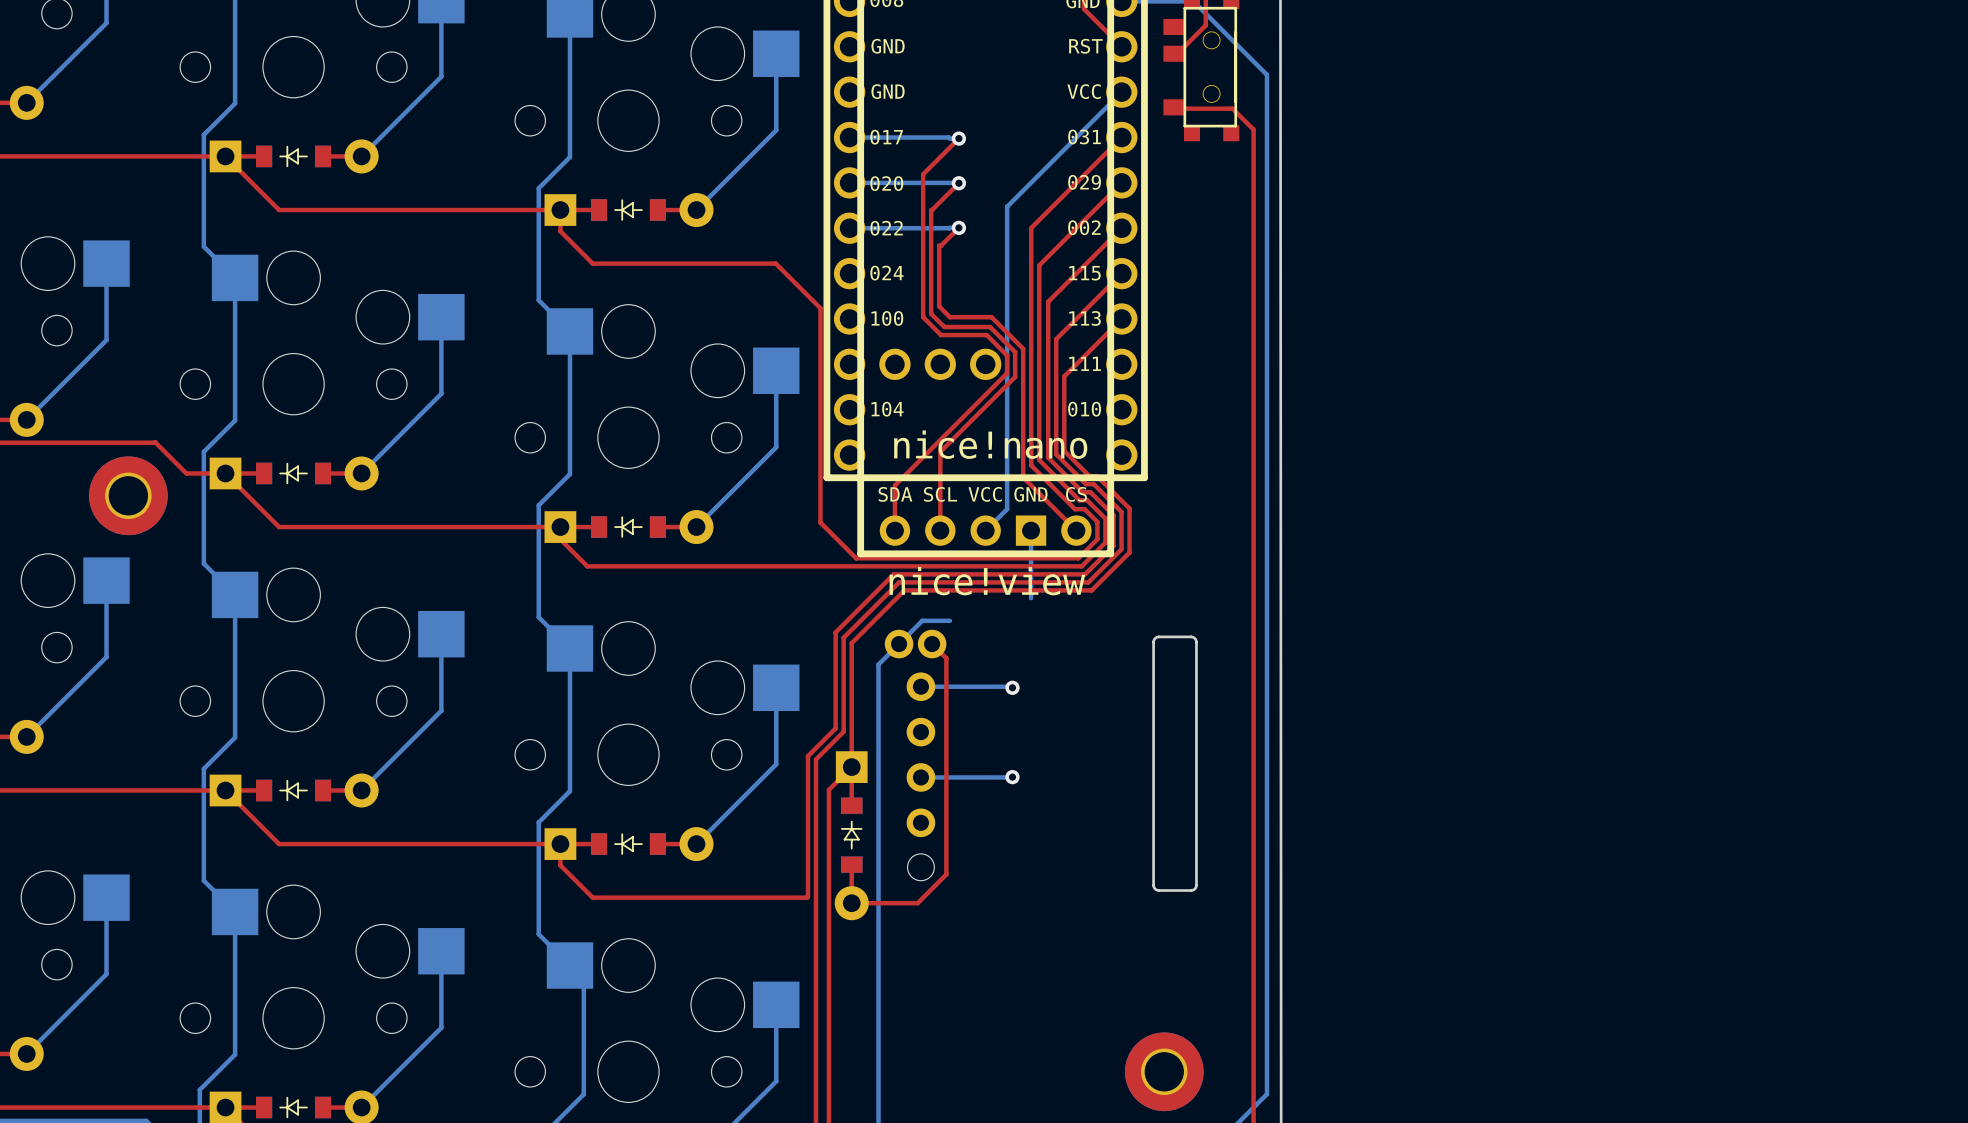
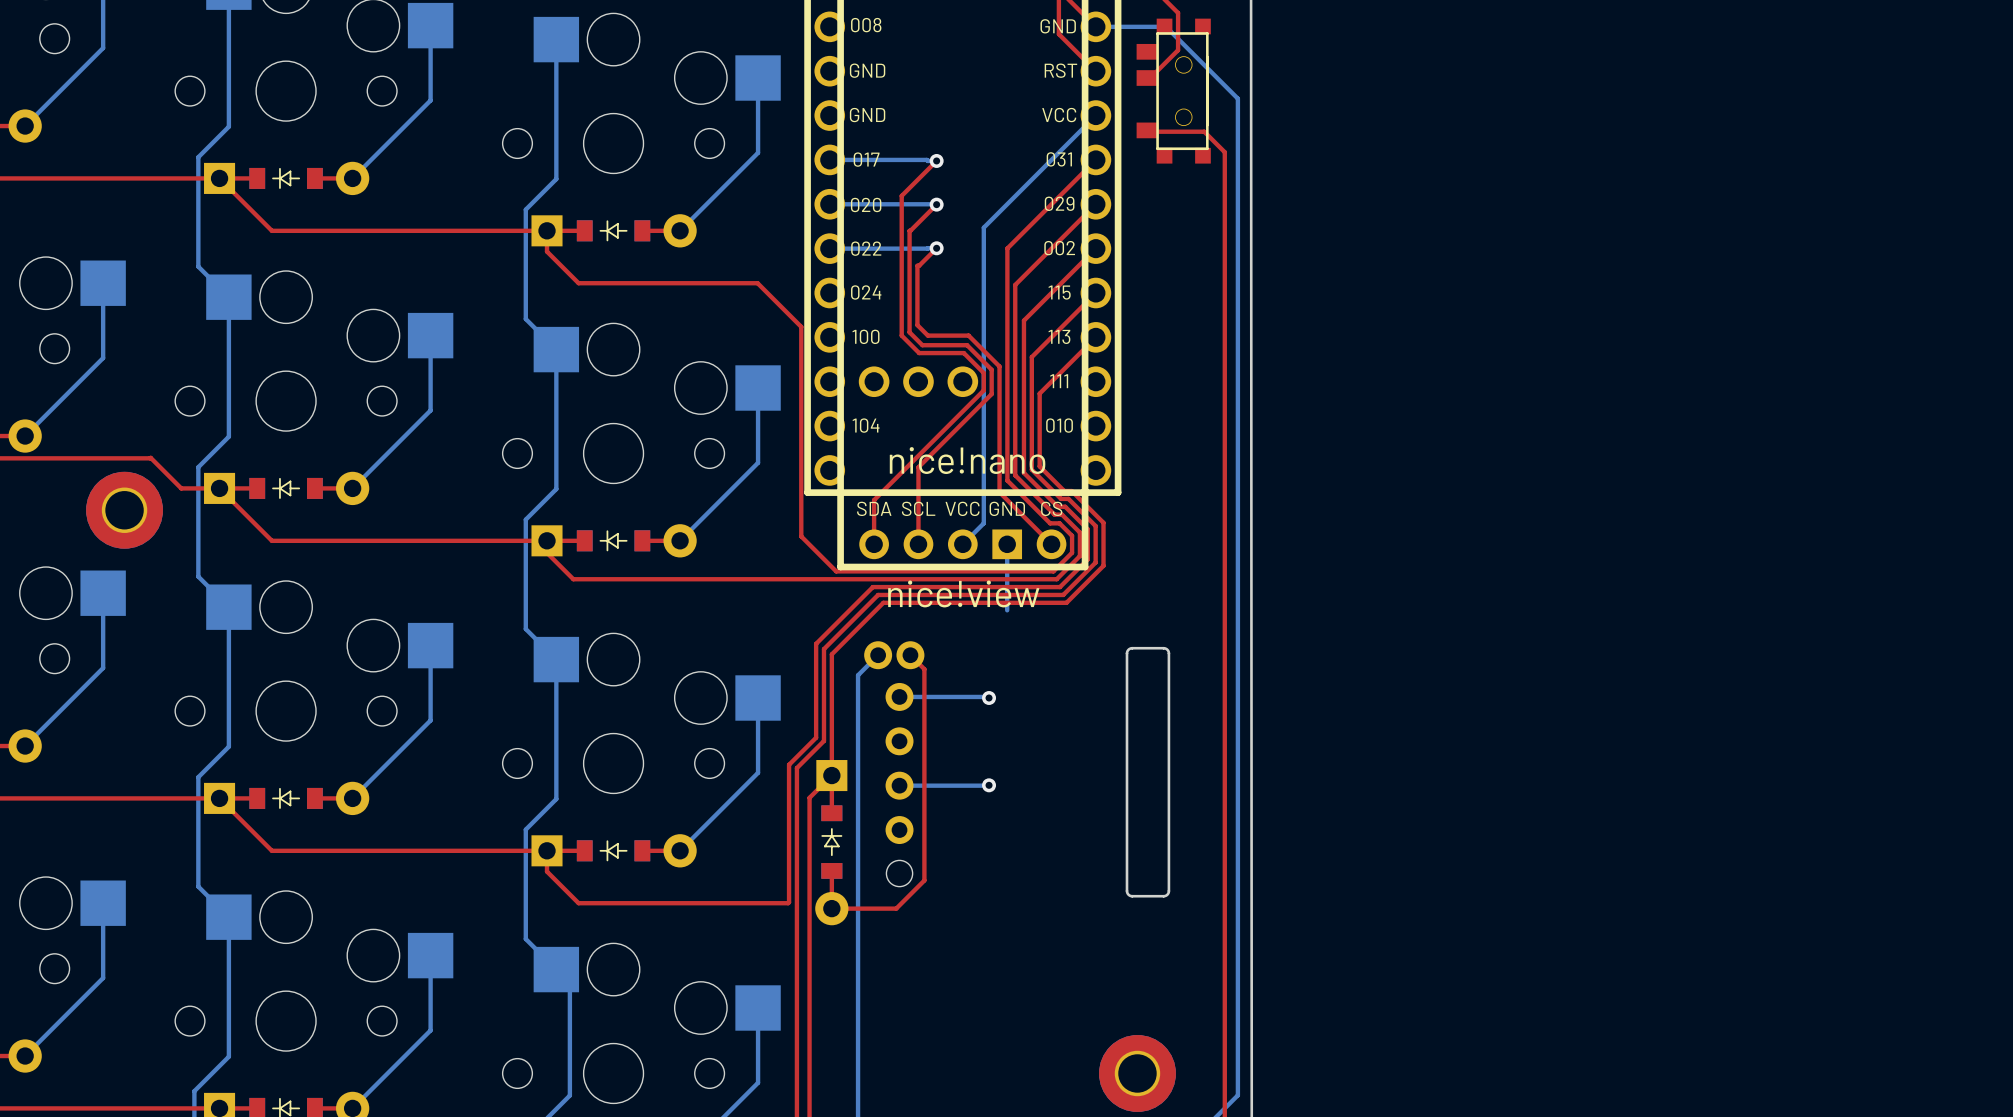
bottom track: (949, 620) (922, 620) (899, 644) -> none

